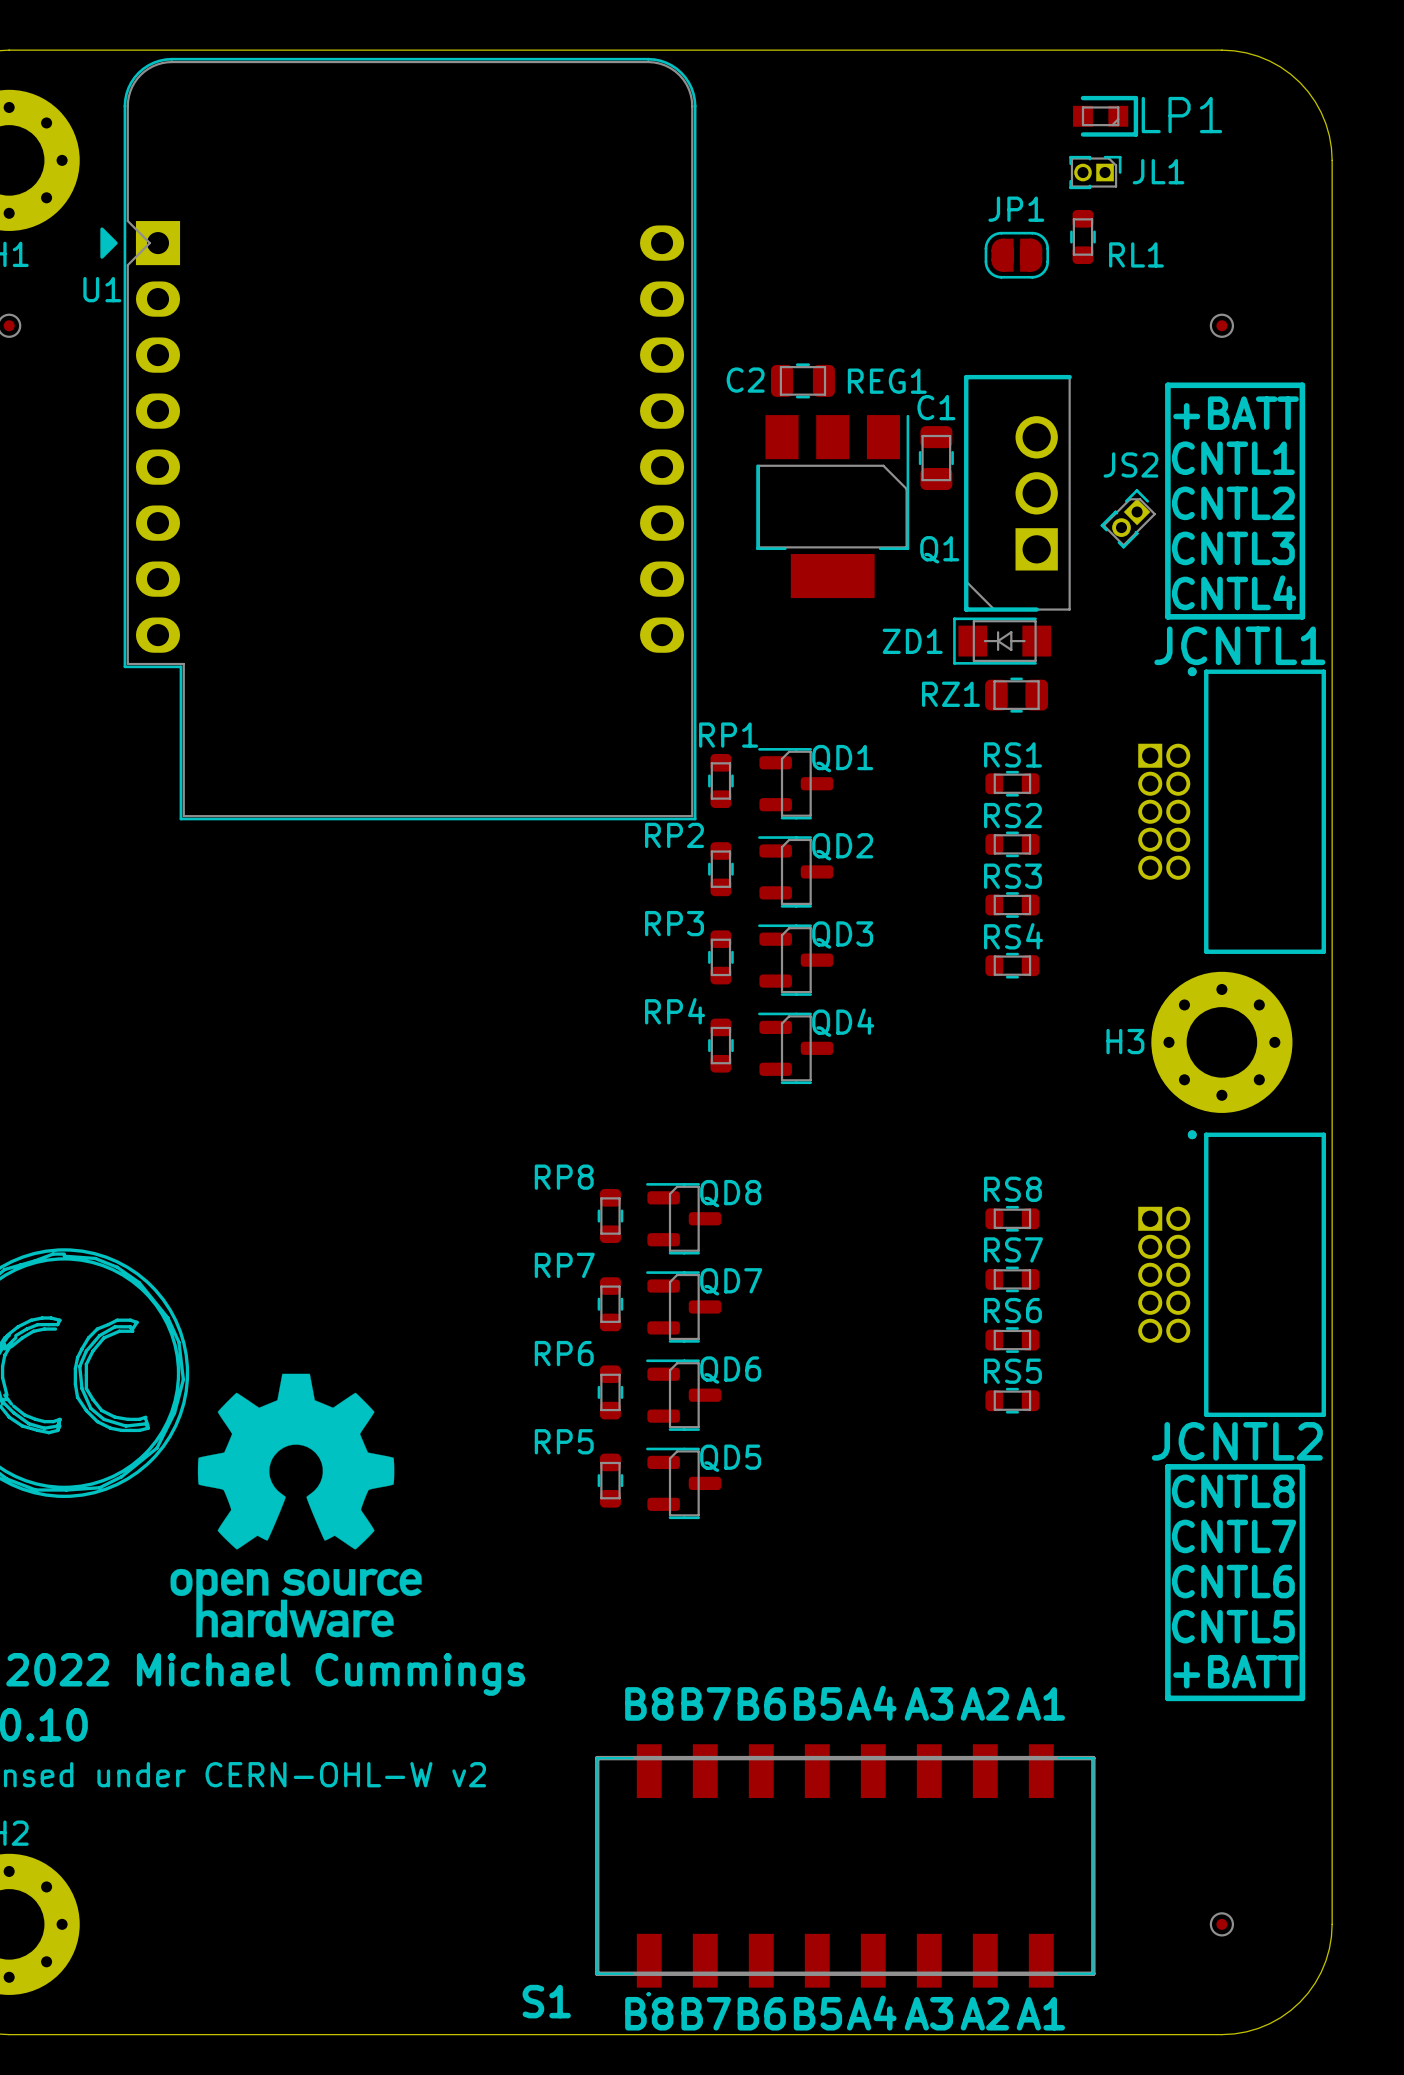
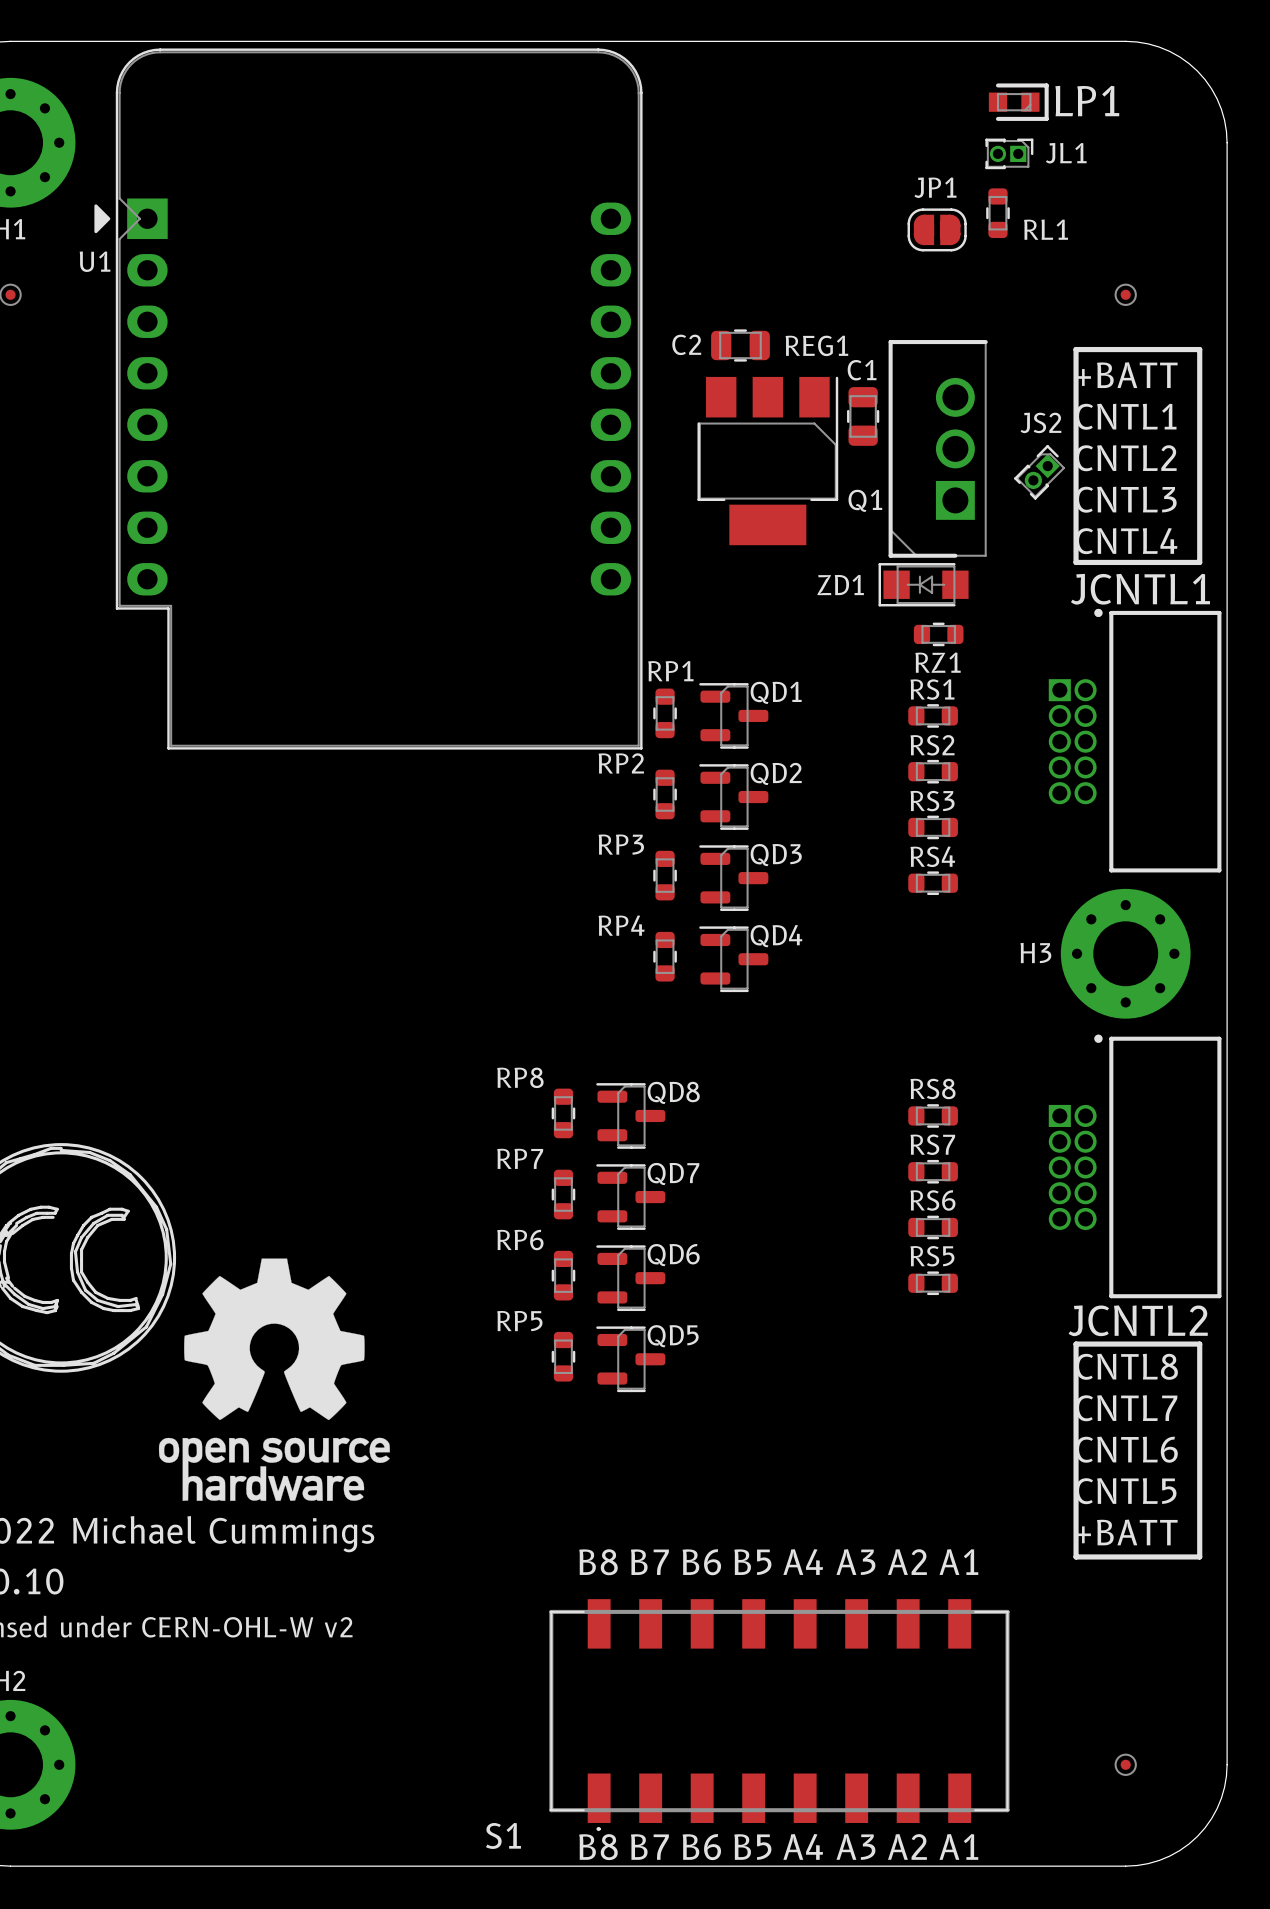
RZ1 footprint: [985, 677, 1048, 713] -> [913, 622, 964, 647]
RZ1 name position: RZ1 (950, 694) -> RZ1 (938, 662)

